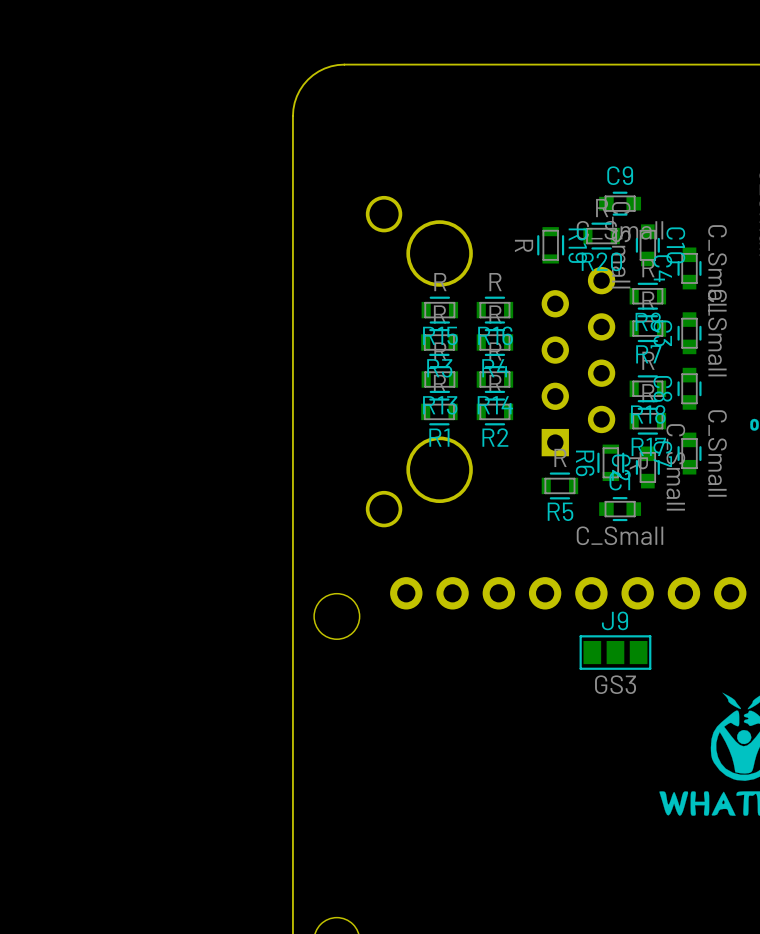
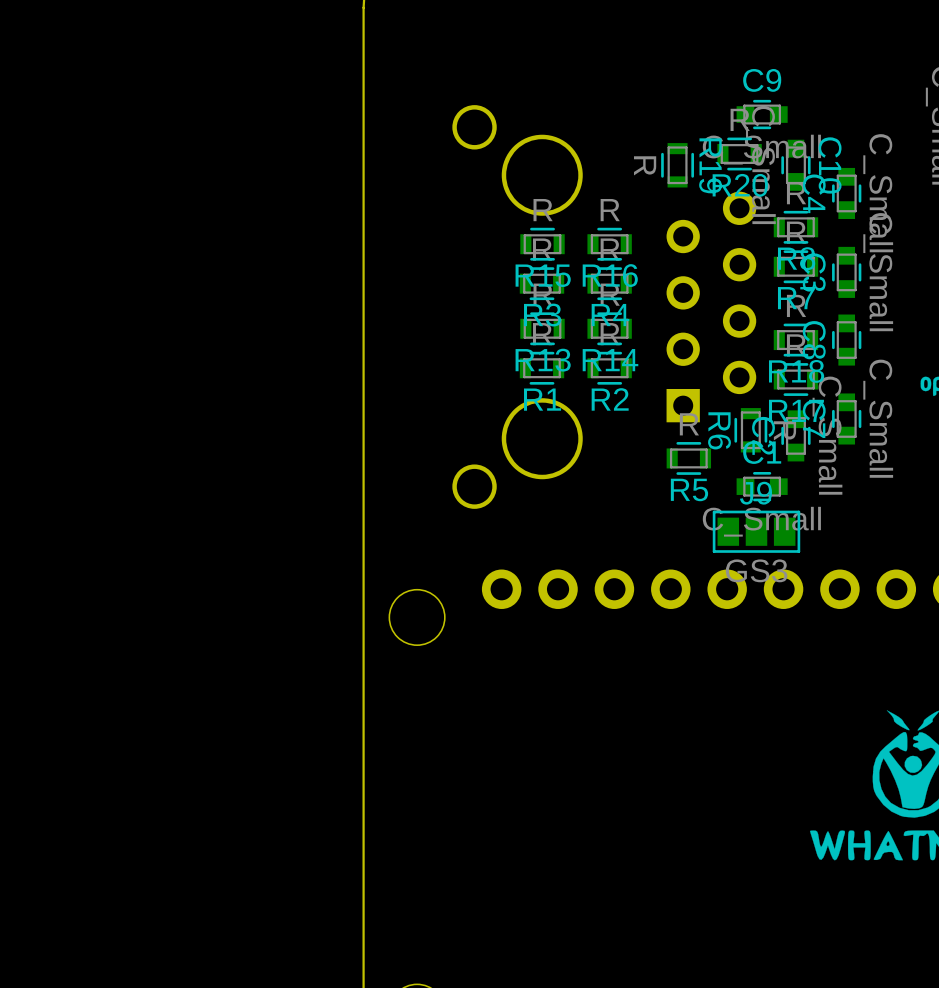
J9 position: (615, 652) -> (756, 531)

